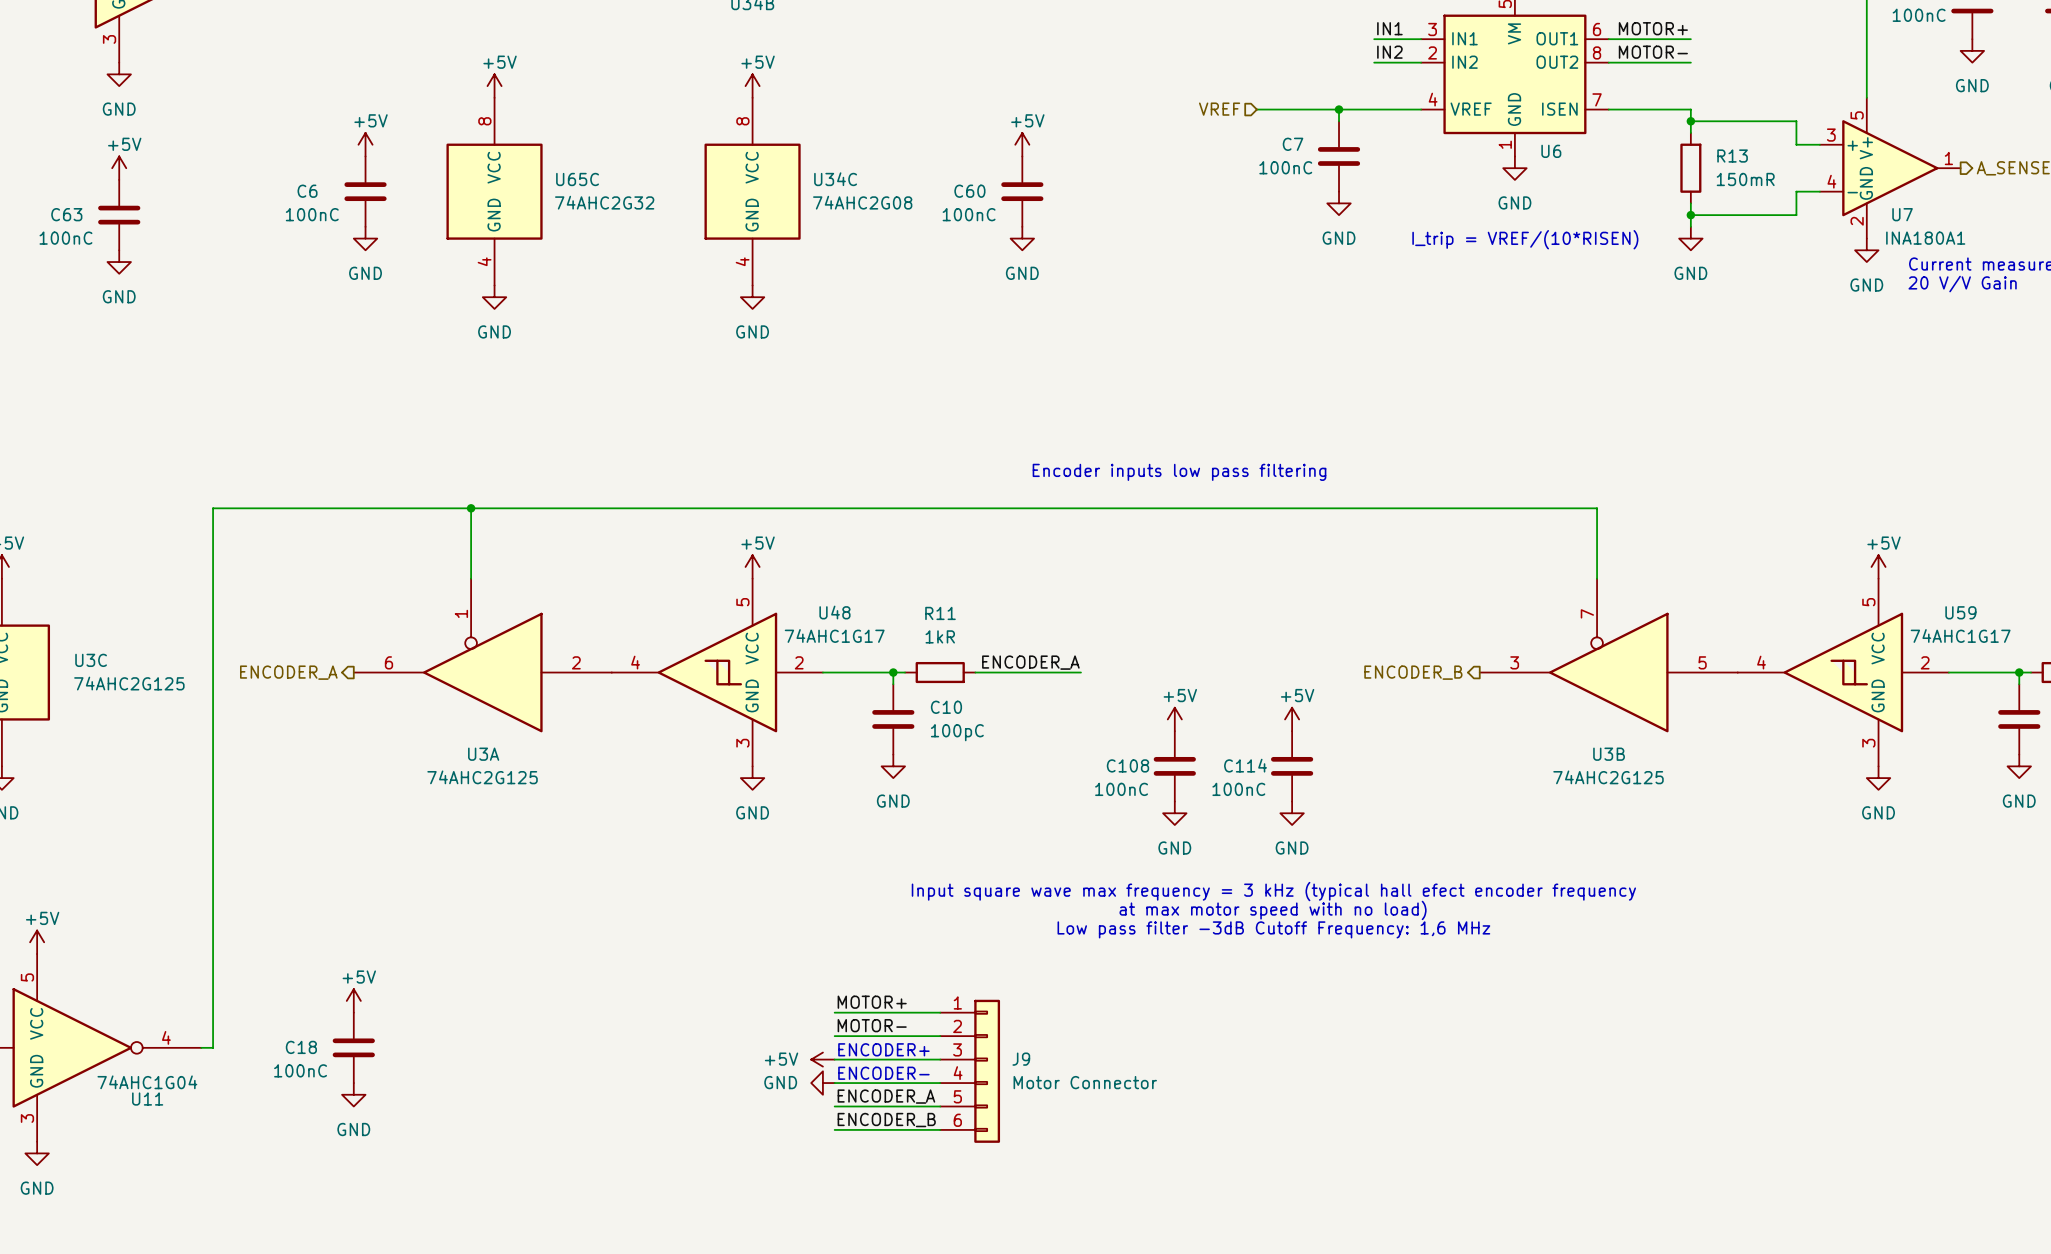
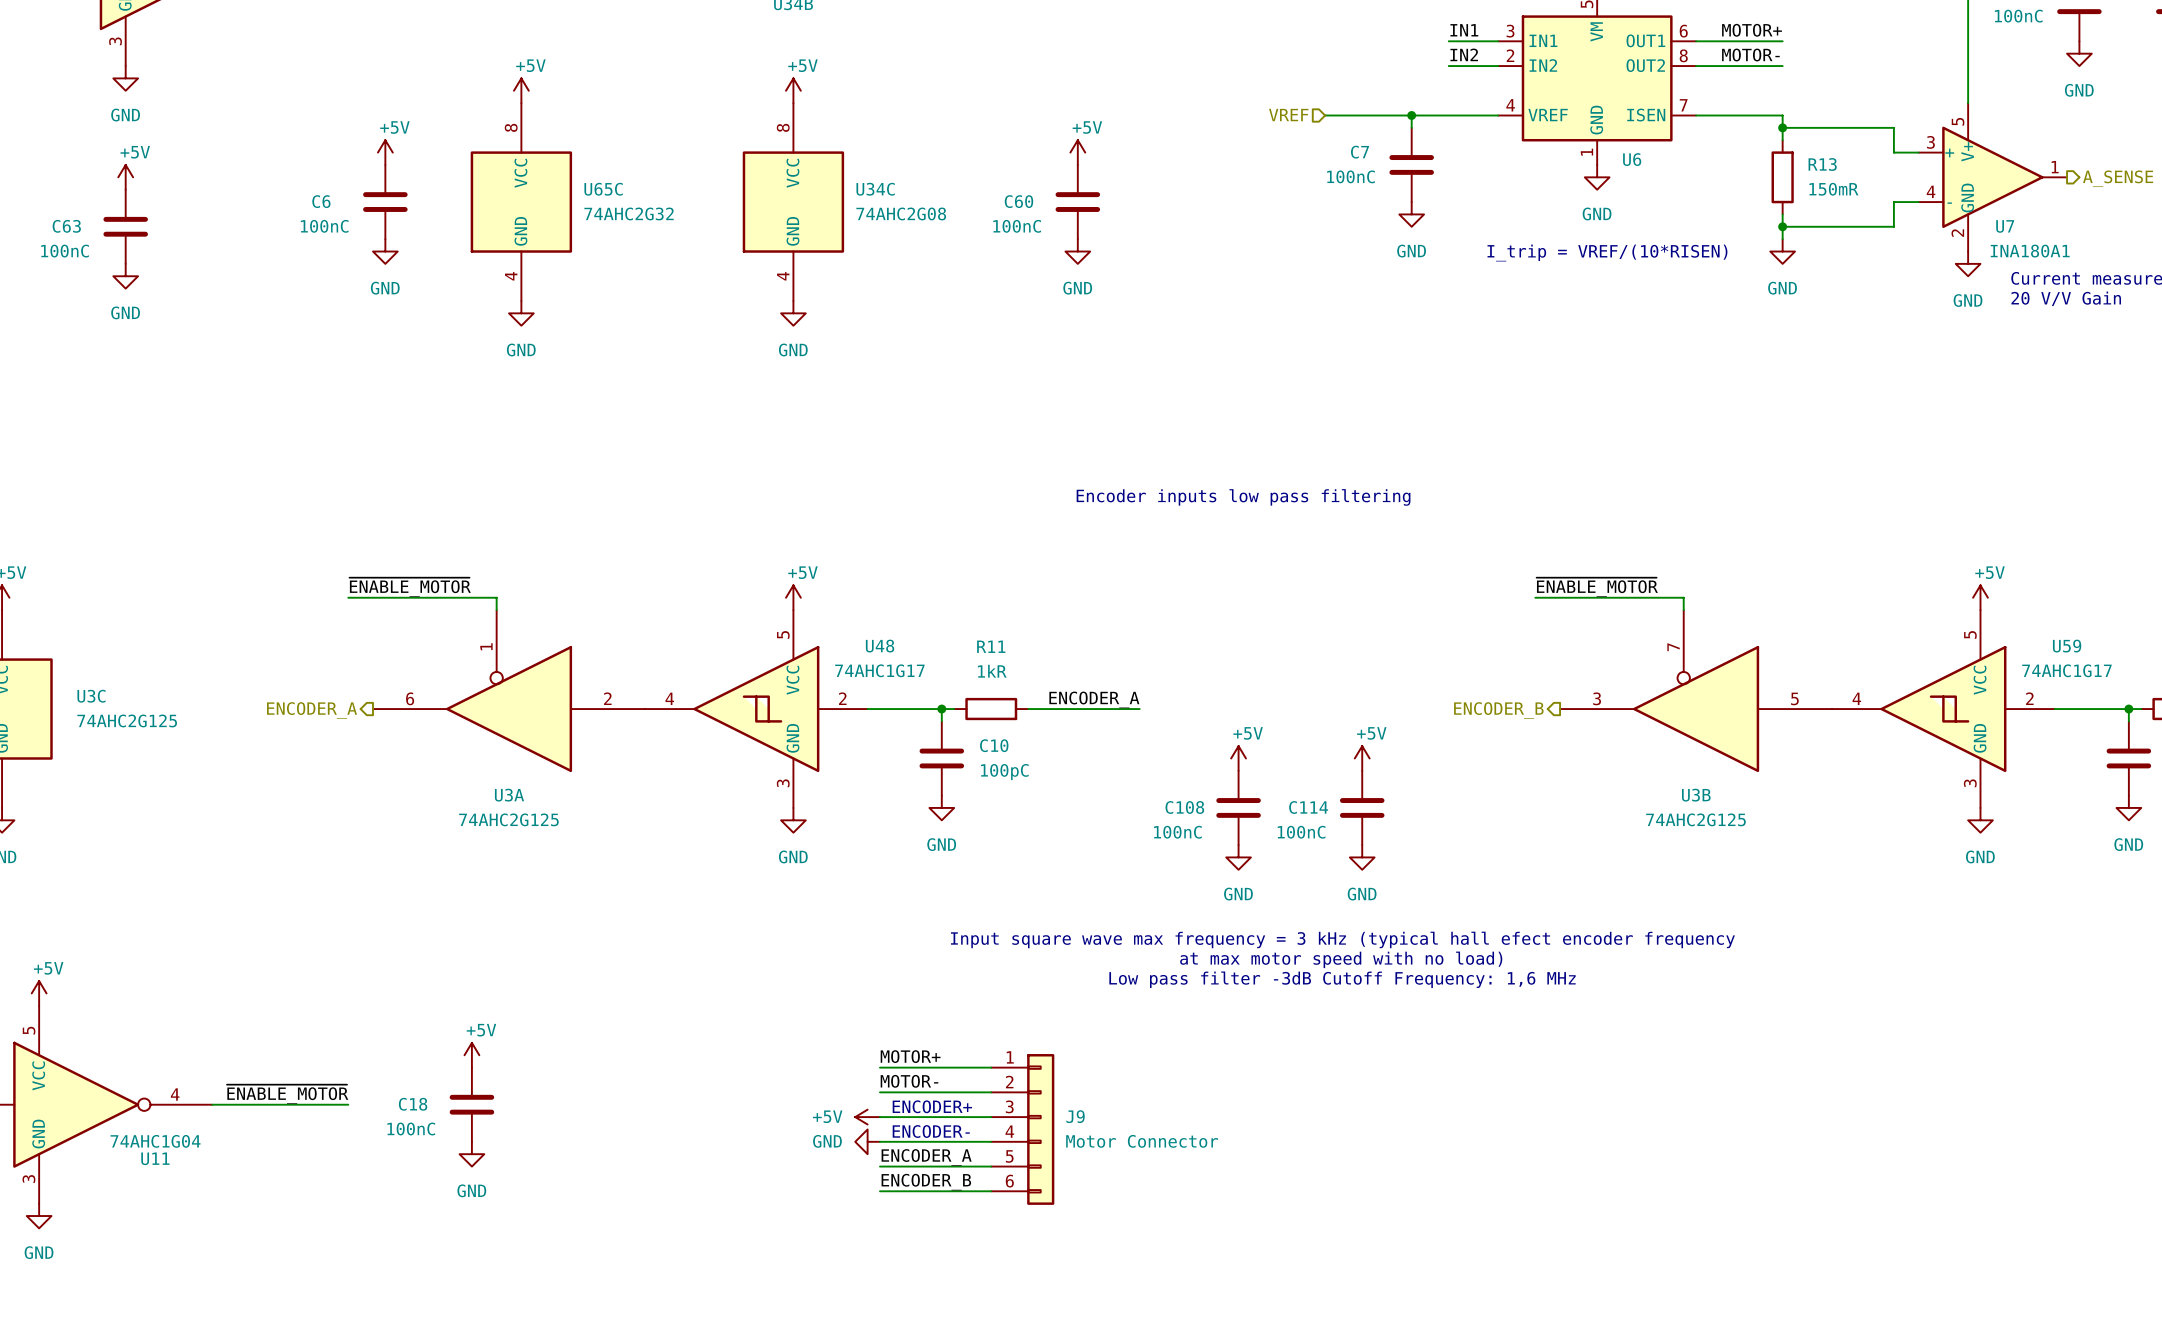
wire: (471, 508) (471, 566) -> (348, 597) (496, 597)
junction: (471, 508) -> none
label: none -> ~{ENABLE_MOTOR} (410, 587)
label: none -> ~{ENABLE_MOTOR} (1597, 587)
wire: (1597, 566) (1597, 508) (213, 508) (213, 1047) -> (1683, 597) (1535, 597)
power symbol position: +5V (353, 1000) -> +5V (471, 1055)
label: none -> ~{ENABLE_MOTOR} (287, 1094)
wire: none -> (224, 1104) (348, 1104)
C18 position: (353, 1047) -> (471, 1104)
power symbol position: GND (353, 1094) -> GND (471, 1154)

